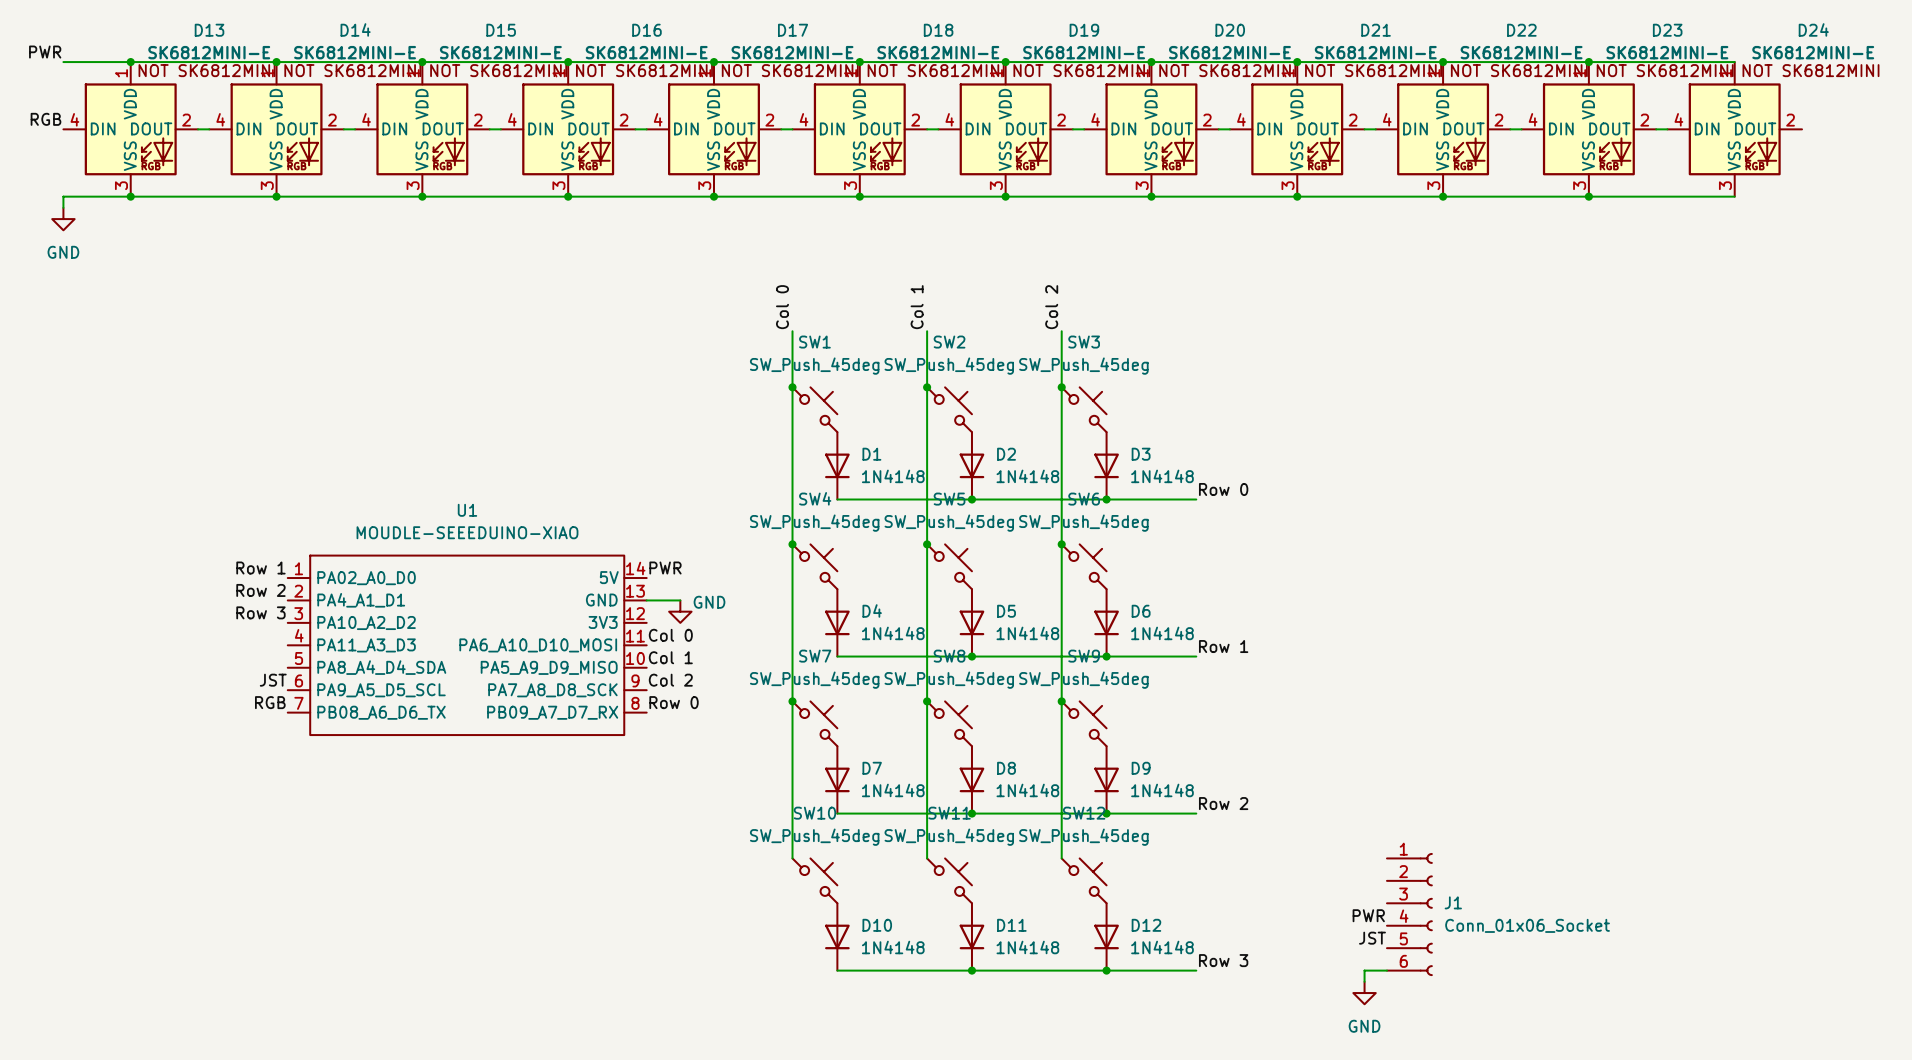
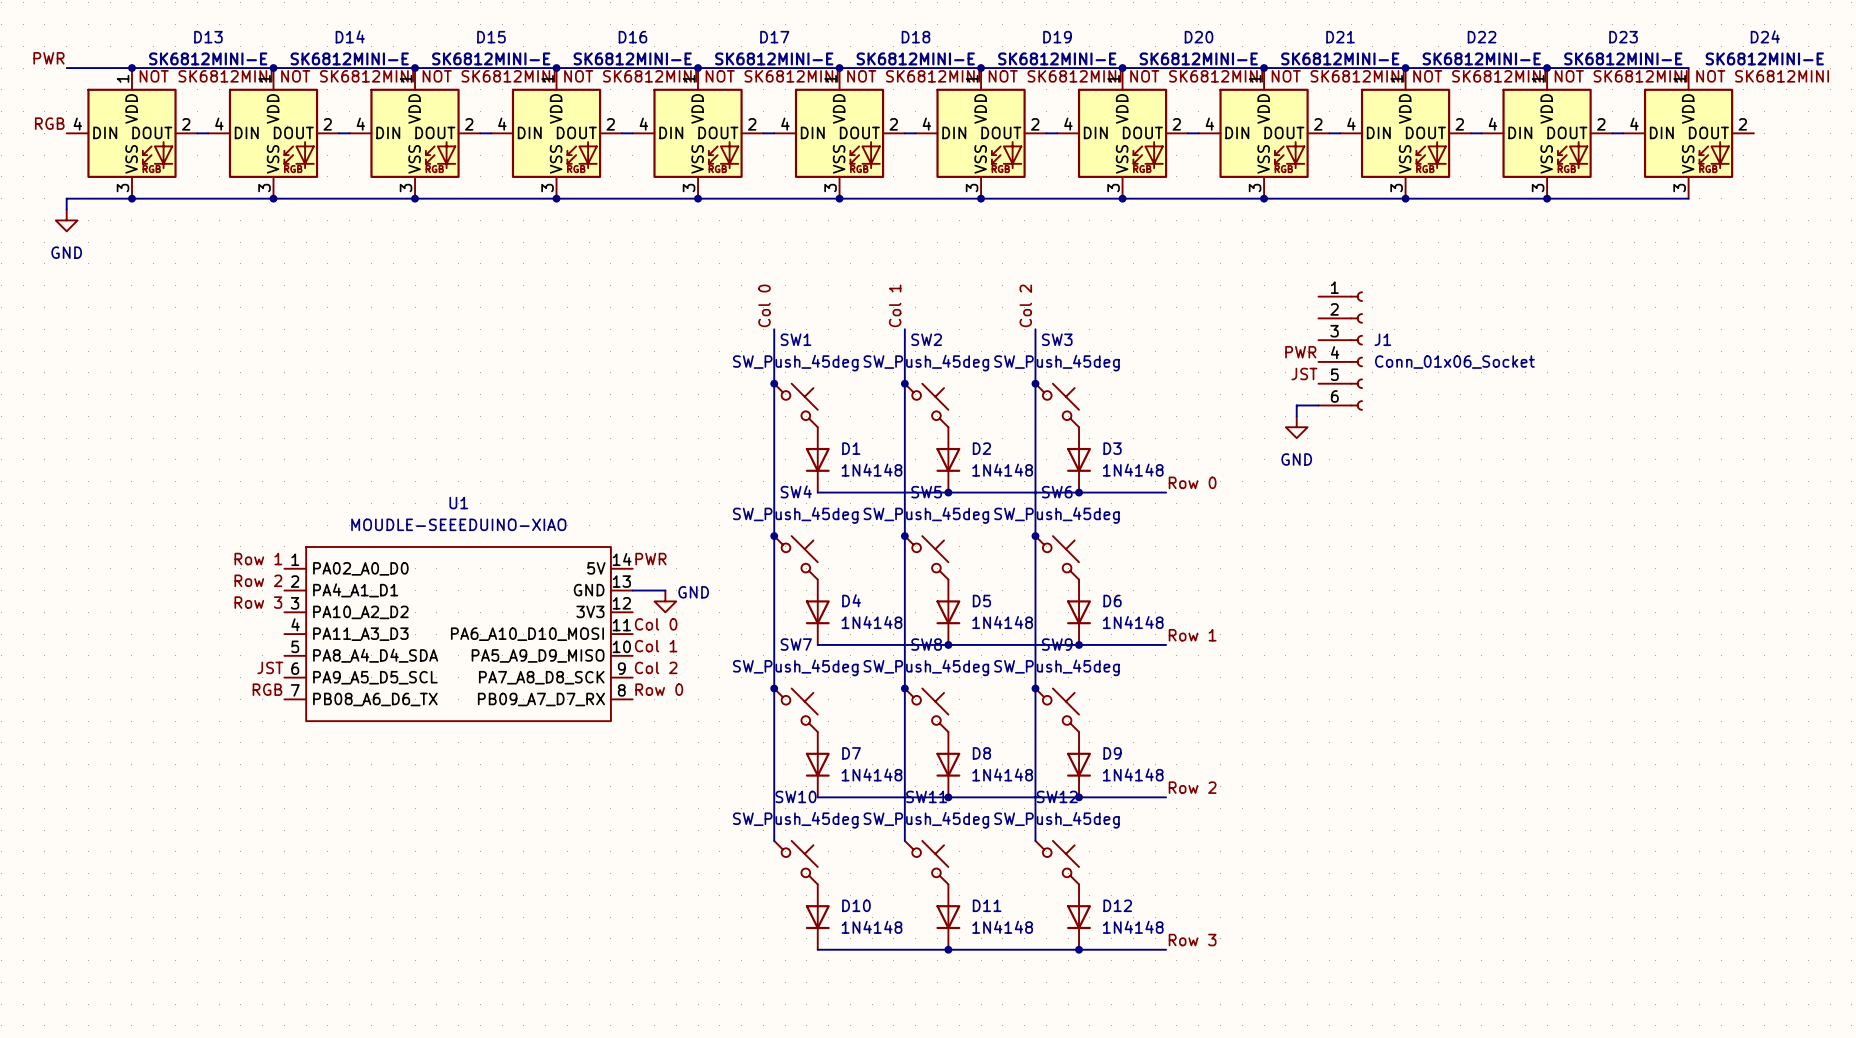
label: none -> PWR (1300, 352)
label: none -> JST (1304, 374)
wire: none -> (1318, 405) (1296, 405) (1296, 416)
power symbol: none -> GND (1296, 427)
J1 position: (1409, 914) -> (1340, 351)
label: PWR (1368, 915) -> none
label: JST (1372, 938) -> none
wire: (1386, 970) (1364, 970) (1364, 981) -> none
power symbol: GND (1364, 993) -> none

